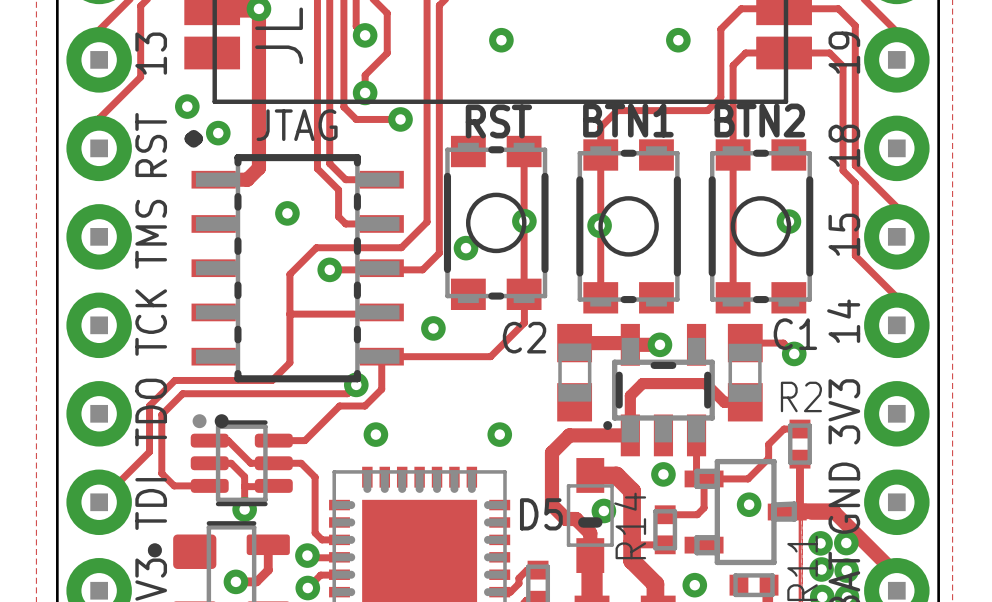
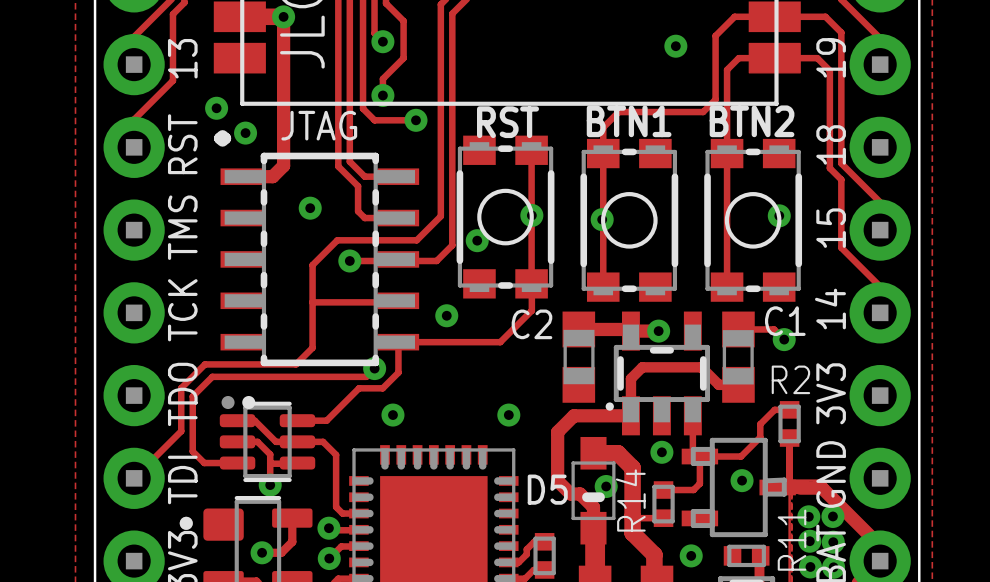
via: (501, 40) -> none

